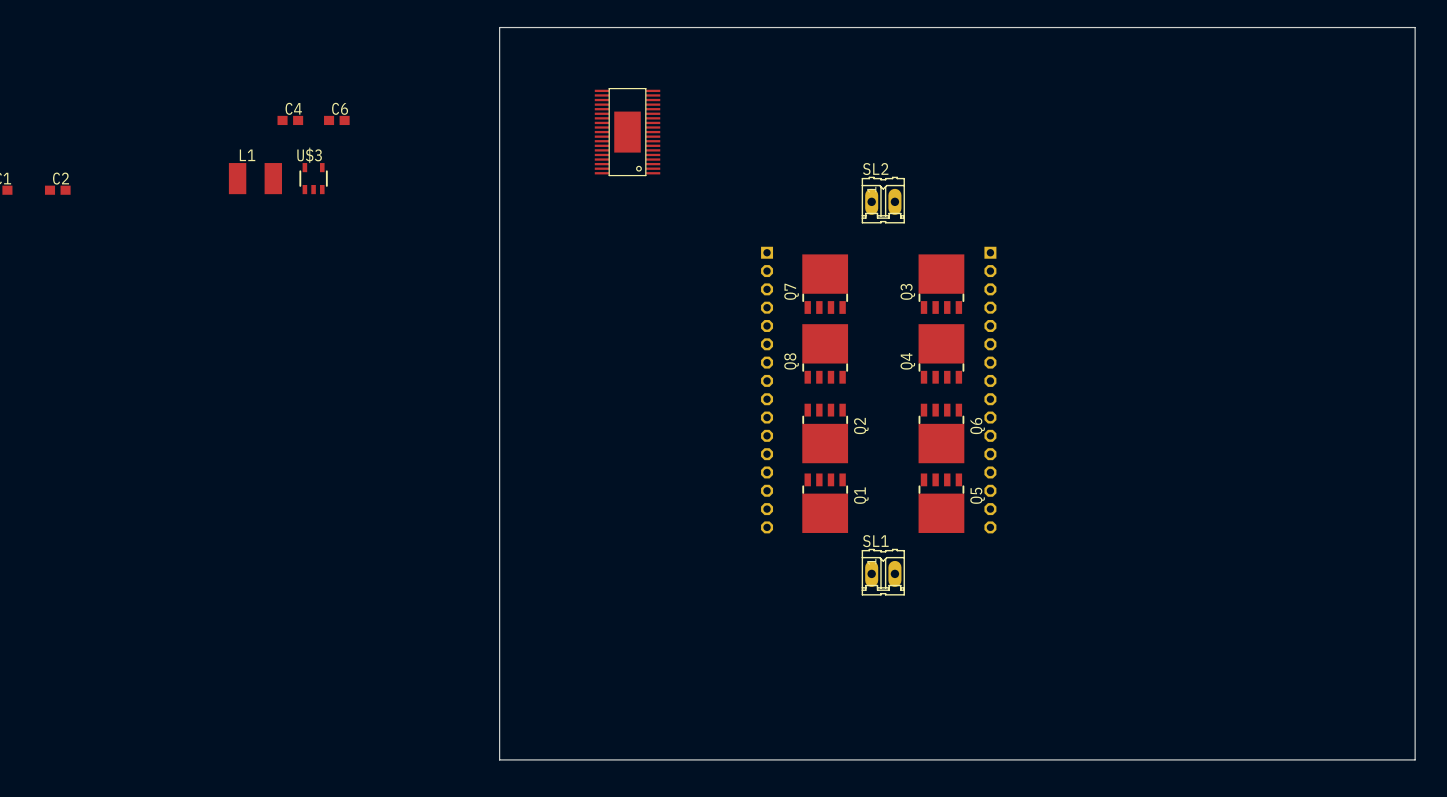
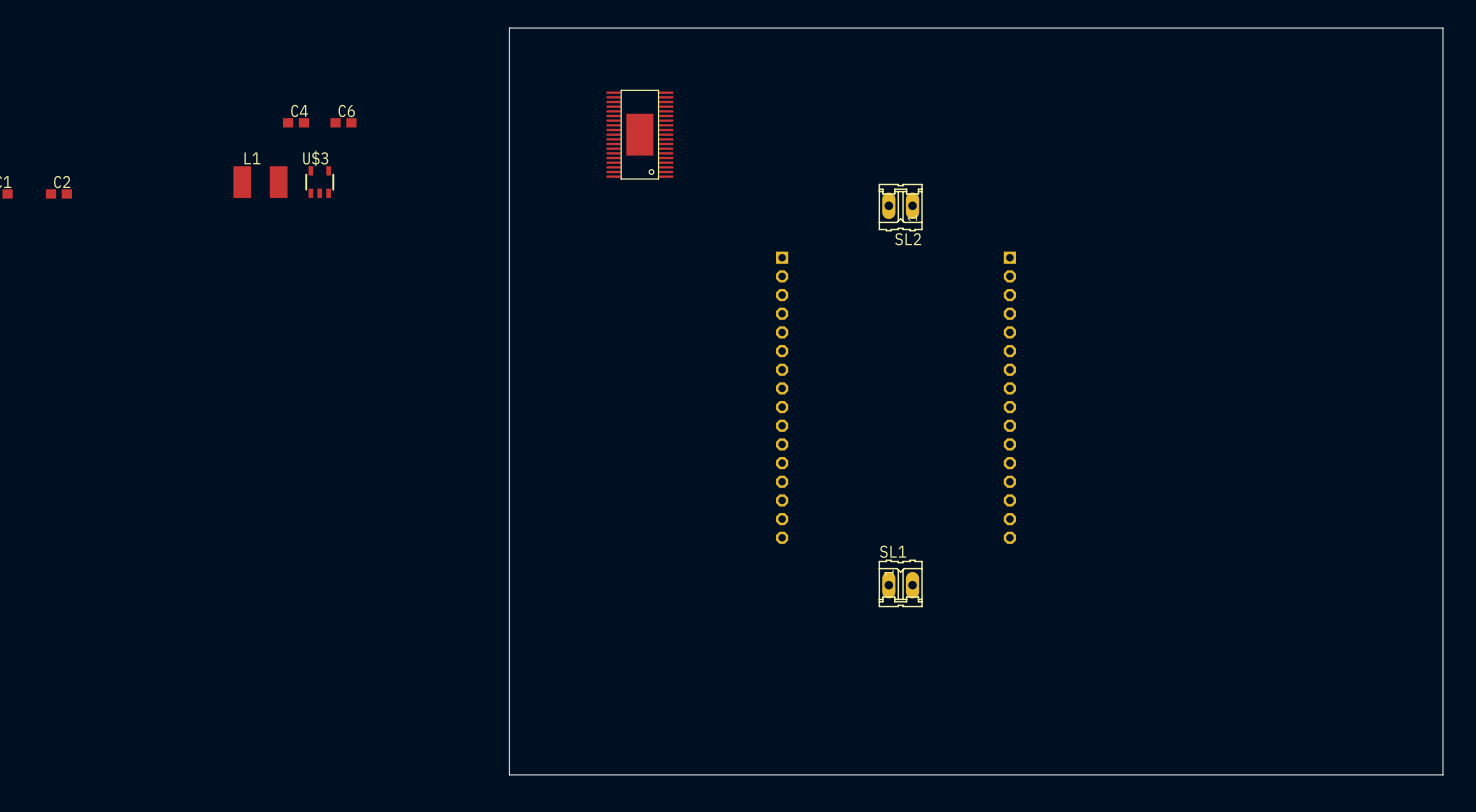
SL2 name position: SL2 (875, 169) -> SL2 (908, 239)
SL2 footprint: [861, 176, 905, 224] -> [878, 183, 923, 232]
Q7: (825, 284) -> none
Q3: (941, 284) -> none
Q8: (825, 353) -> none
Q4: (941, 353) -> none
Q2: (825, 433) -> none
Q6: (941, 433) -> none
Q1: (825, 503) -> none
Q5: (941, 503) -> none

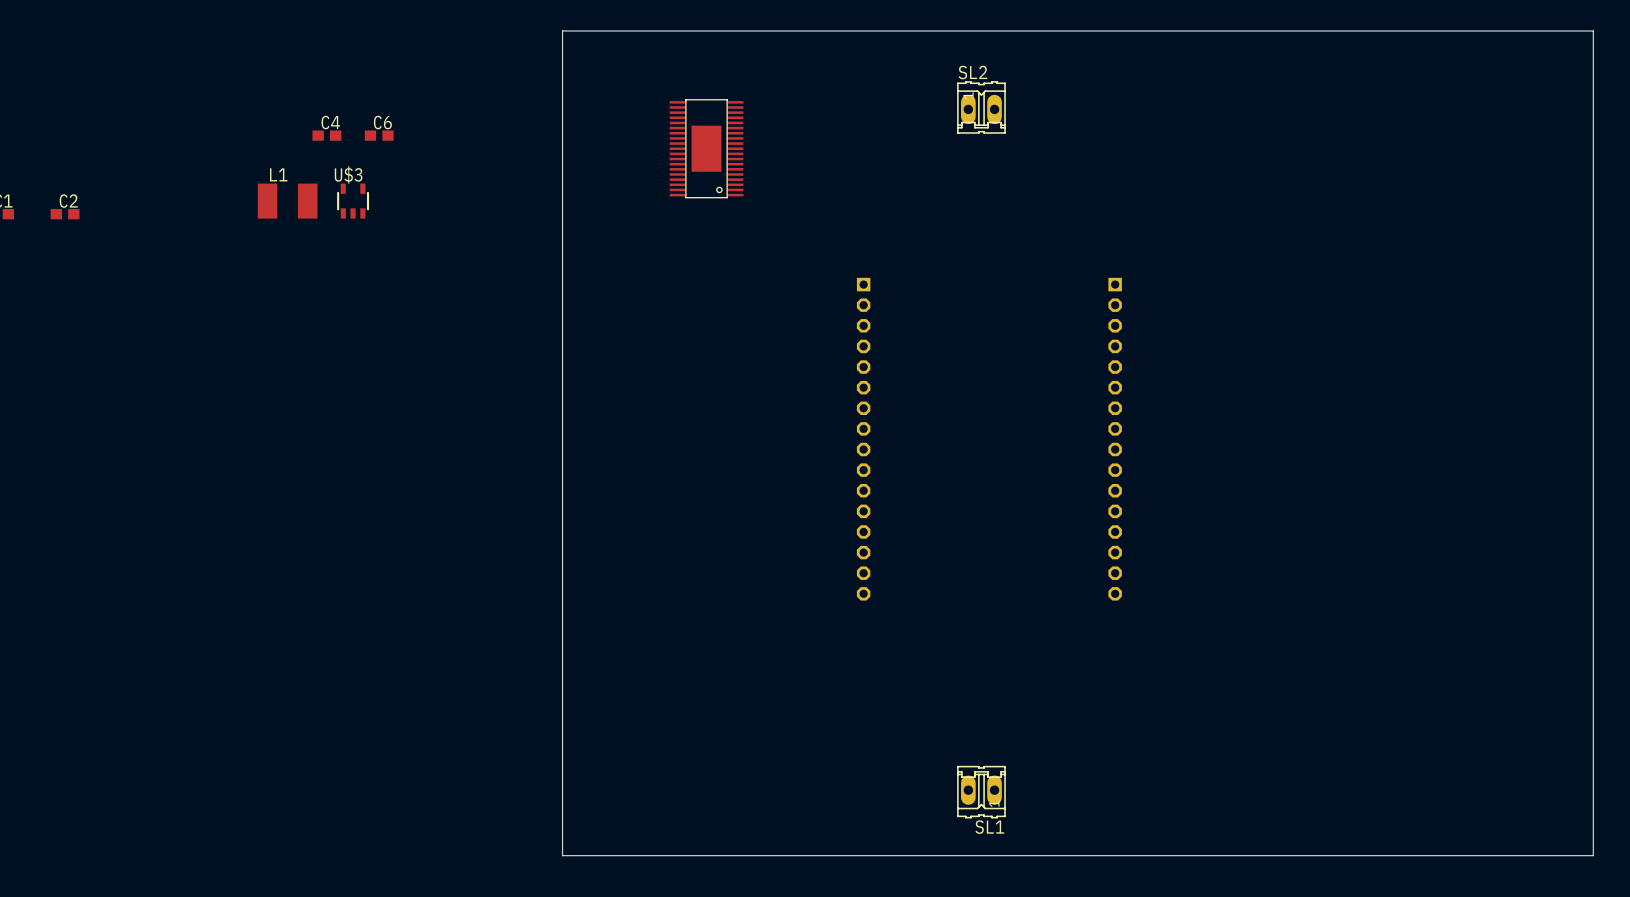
SL2 footprint: [878, 183, 923, 232] -> [957, 81, 1006, 134]
SL2 name position: SL2 (908, 239) -> SL2 (972, 72)
SL1 name position: SL1 (893, 551) -> SL1 (989, 827)
SL1 footprint: [878, 559, 923, 608] -> [957, 765, 1006, 819]

